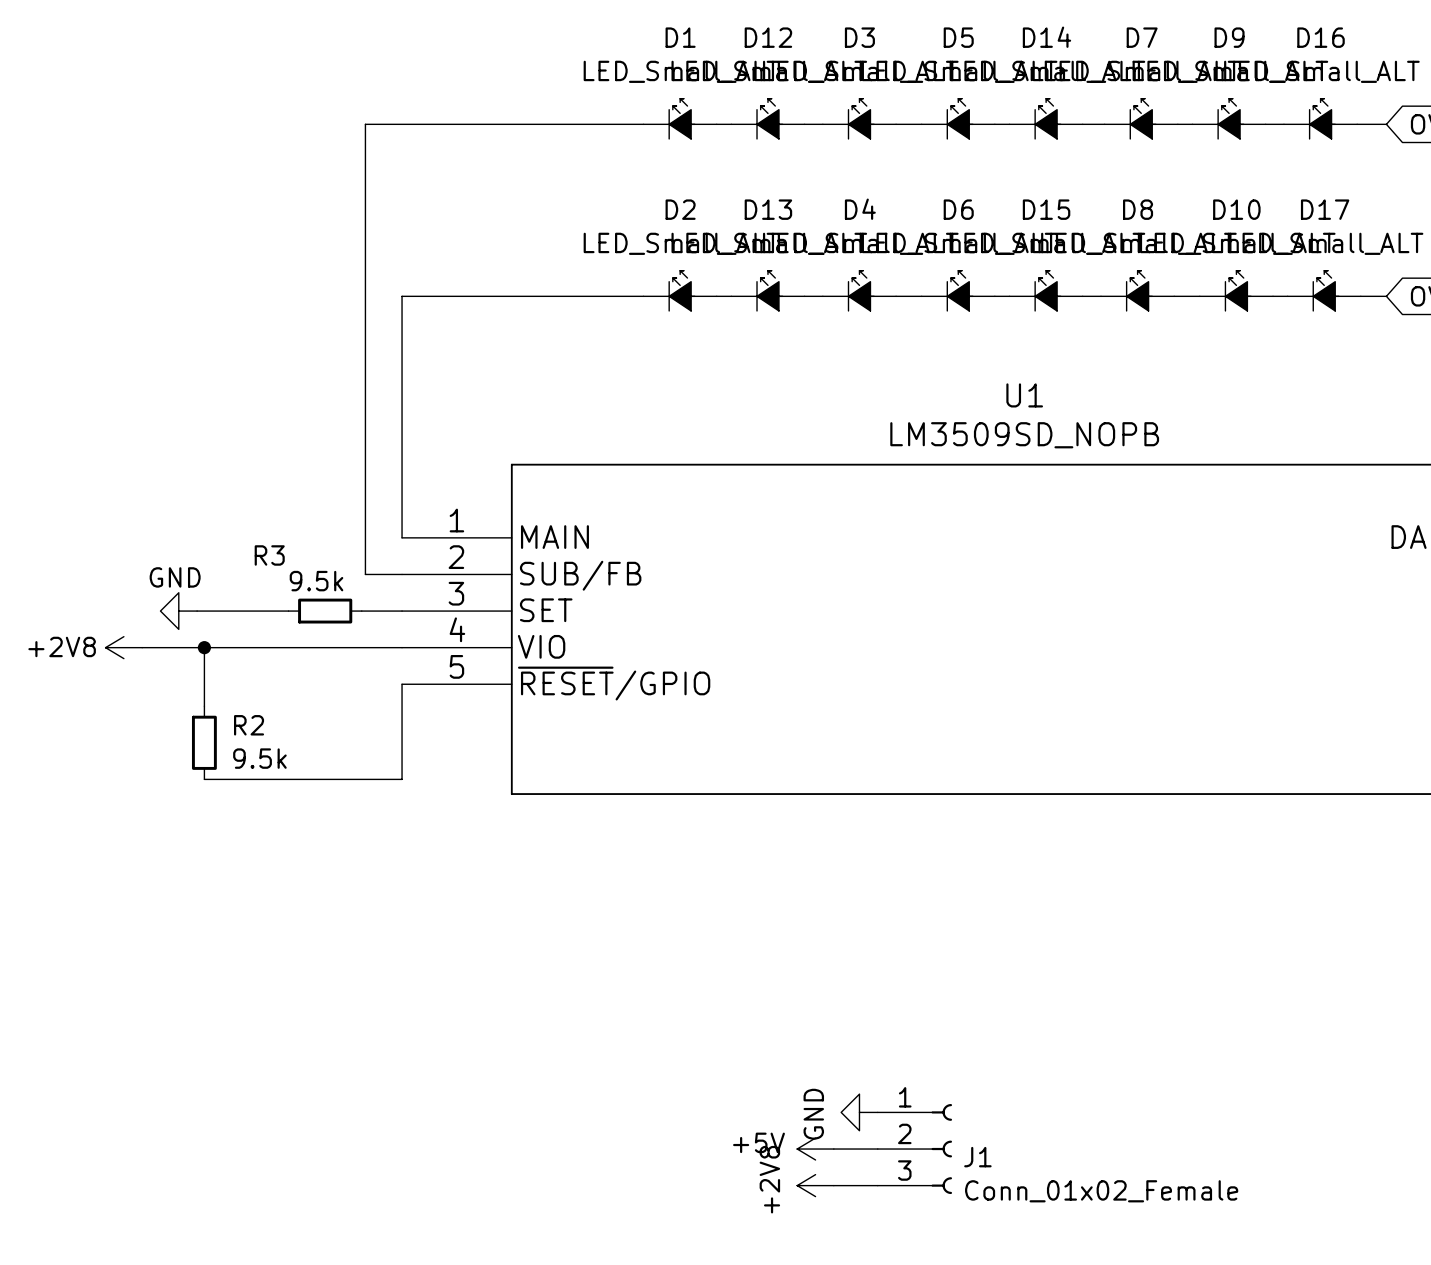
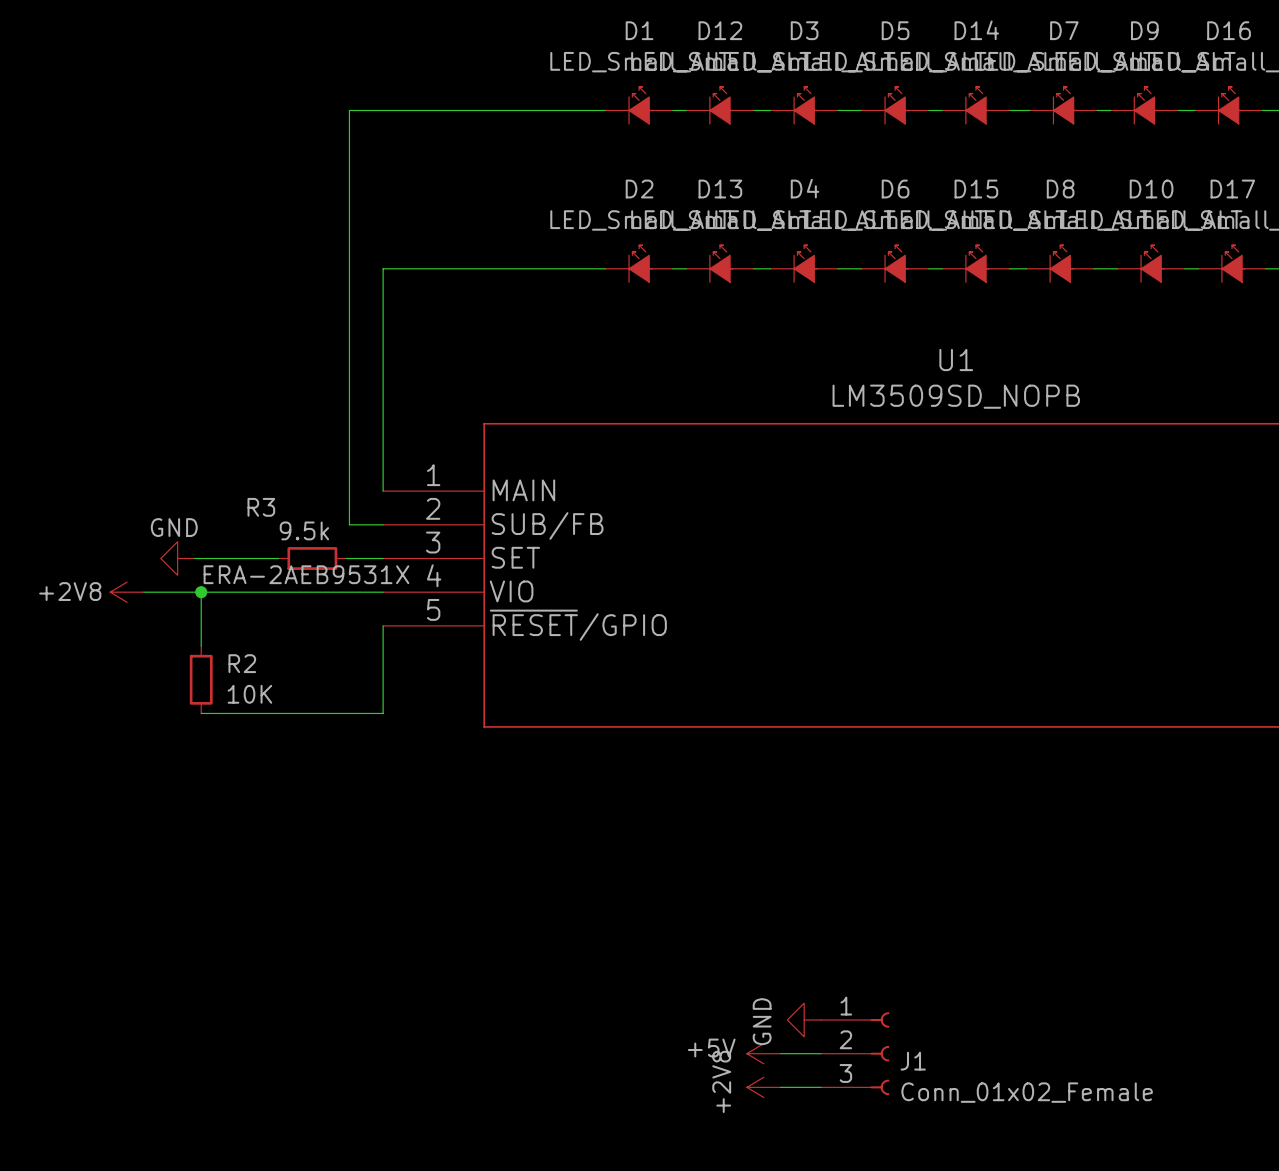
R3 text: none -> ERA-2AEB9531X (306, 574)
R2 value: 9.5k (259, 758) -> 10K (249, 694)

